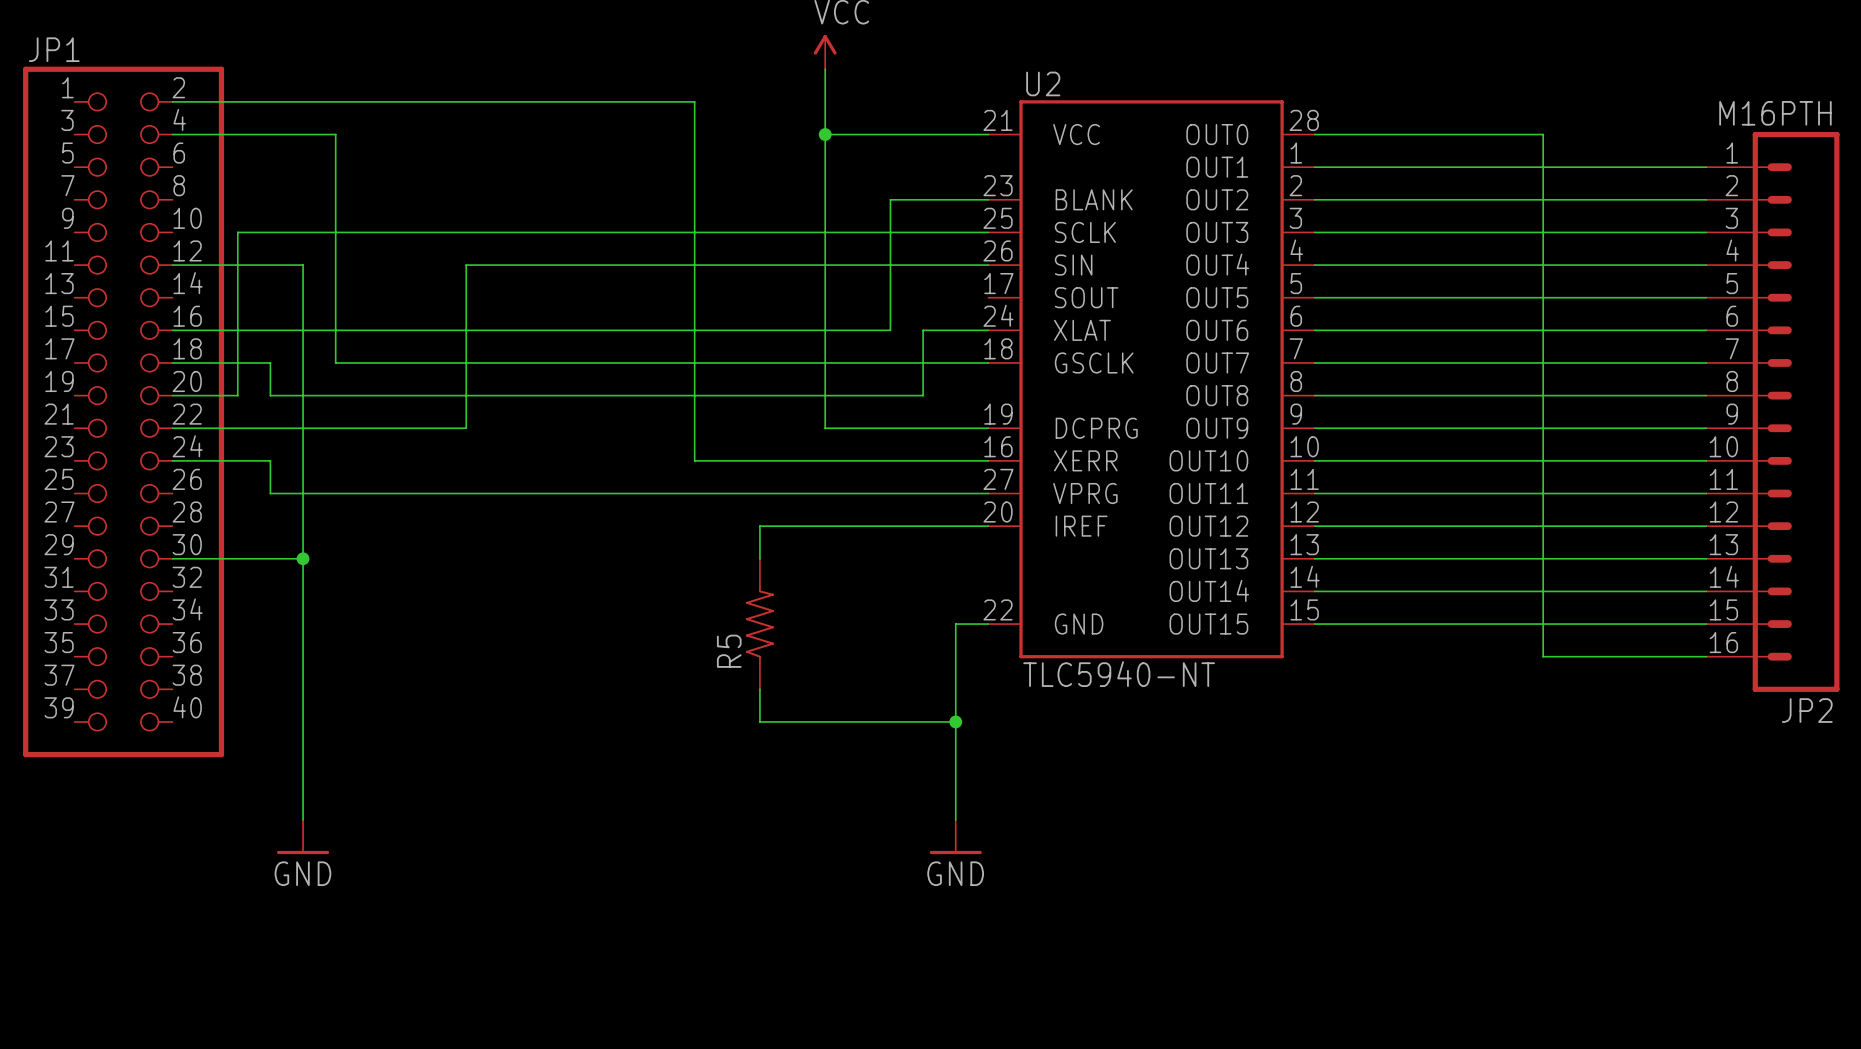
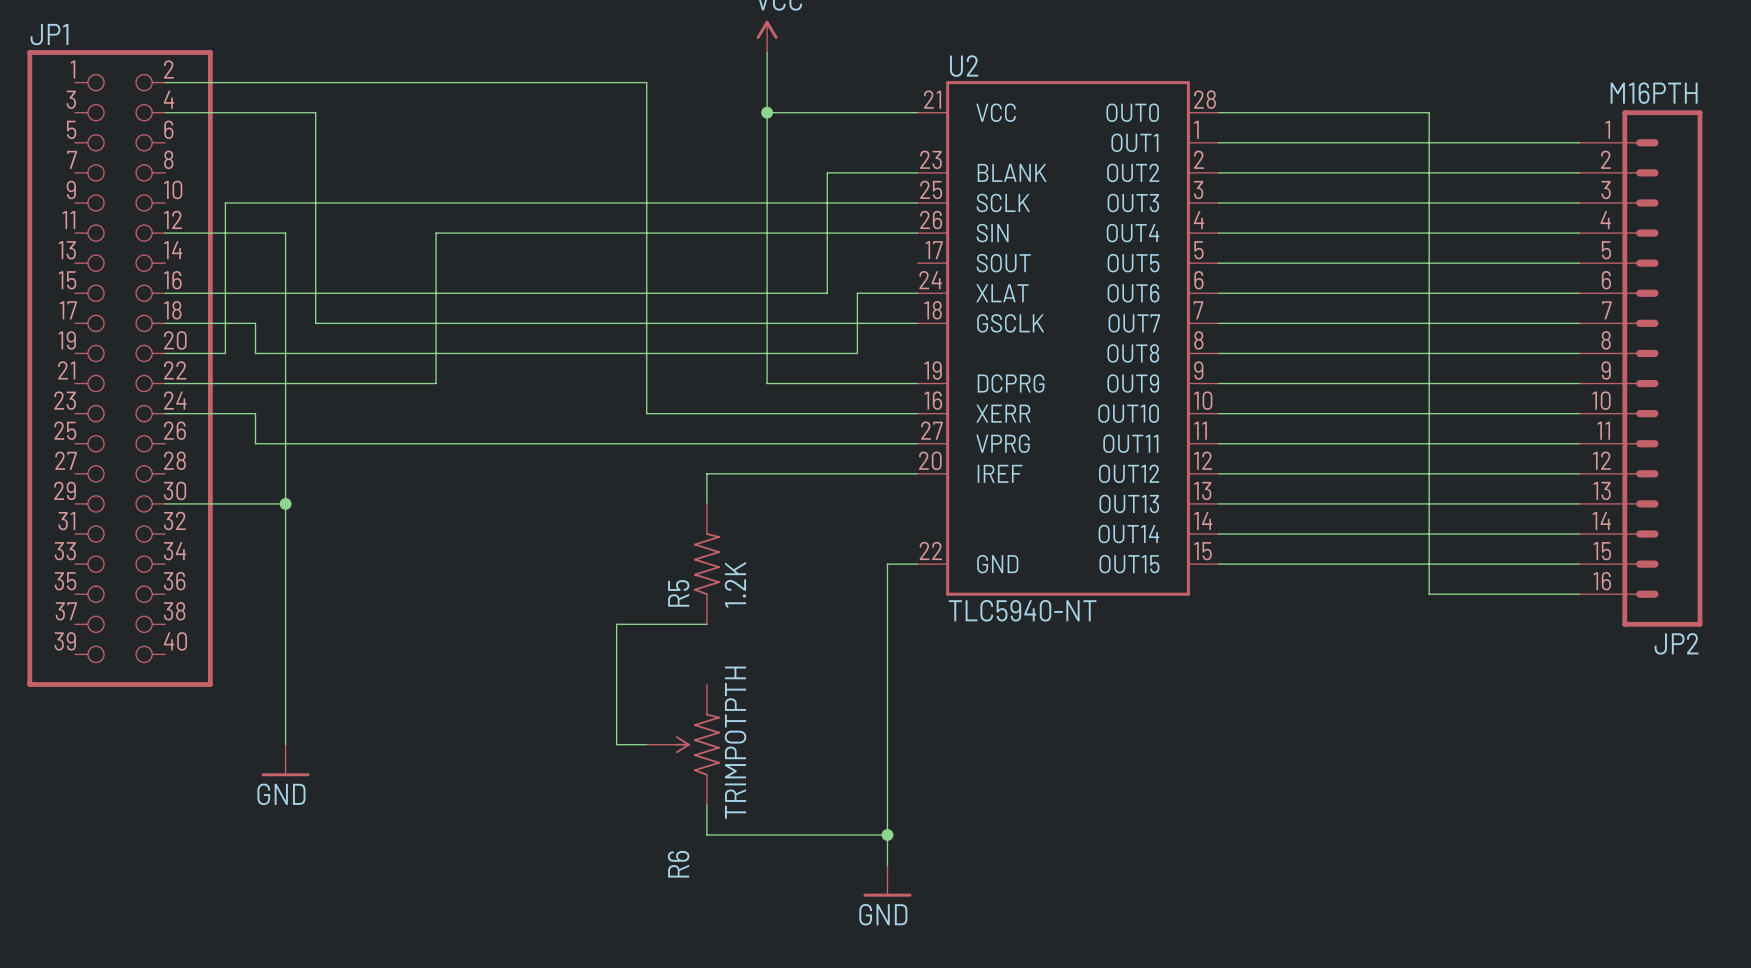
R5 value: none -> 1.2K (735, 584)
wire: (759, 689) (759, 721) (955, 721) -> (706, 624) (616, 624) (616, 744) (646, 744)
junction: (955, 721) -> none
R6: none -> TRIMPOTPTH (683, 744)
wire: none -> (887, 744) (887, 865)
power symbol position: GND (955, 836) -> GND (887, 880)
wire: none -> (706, 804) (706, 834) (887, 834)
junction: none -> (887, 834)

